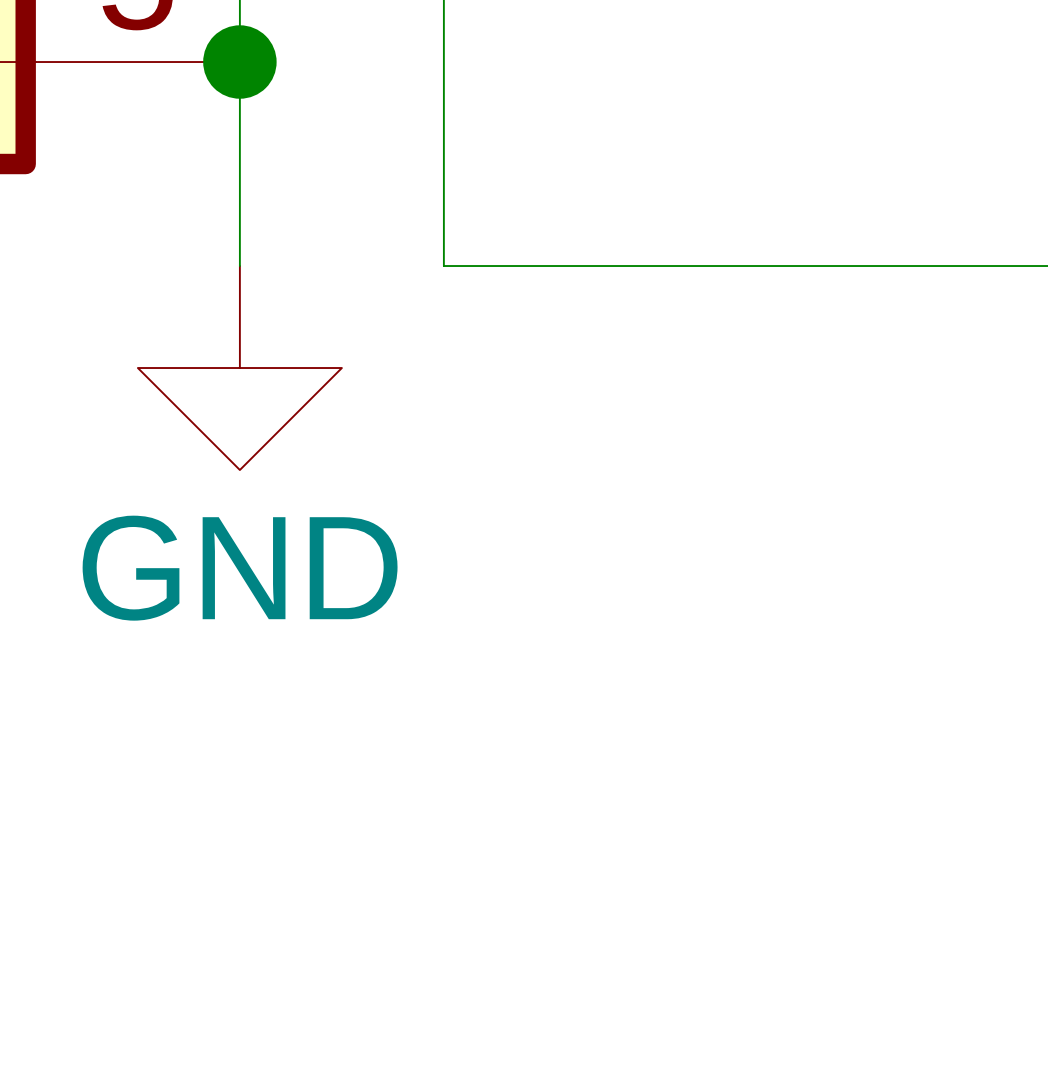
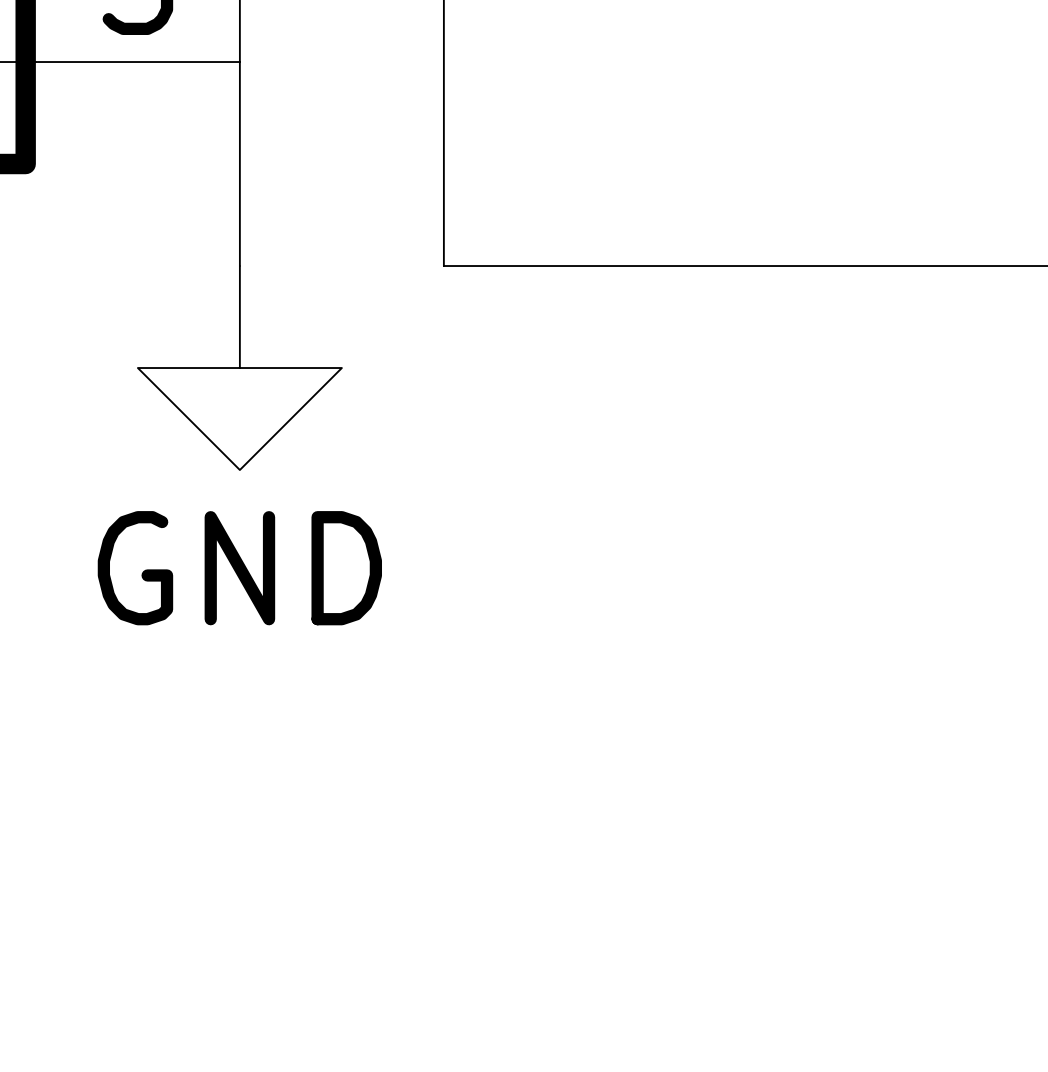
junction: (239, 62) -> none

